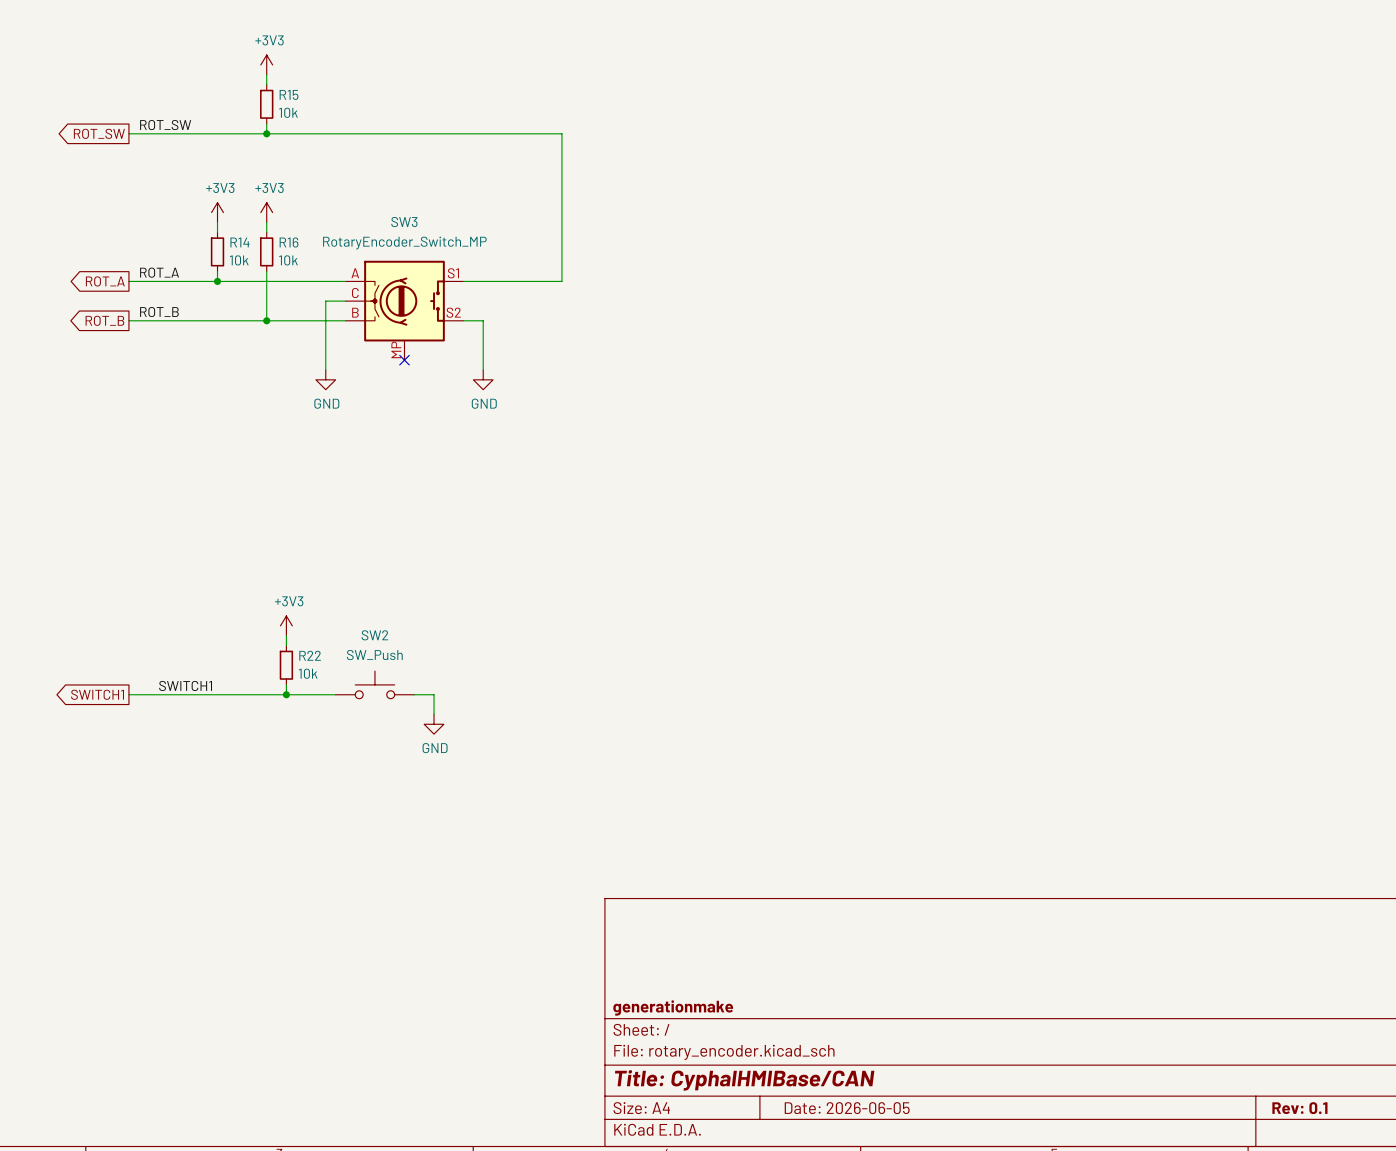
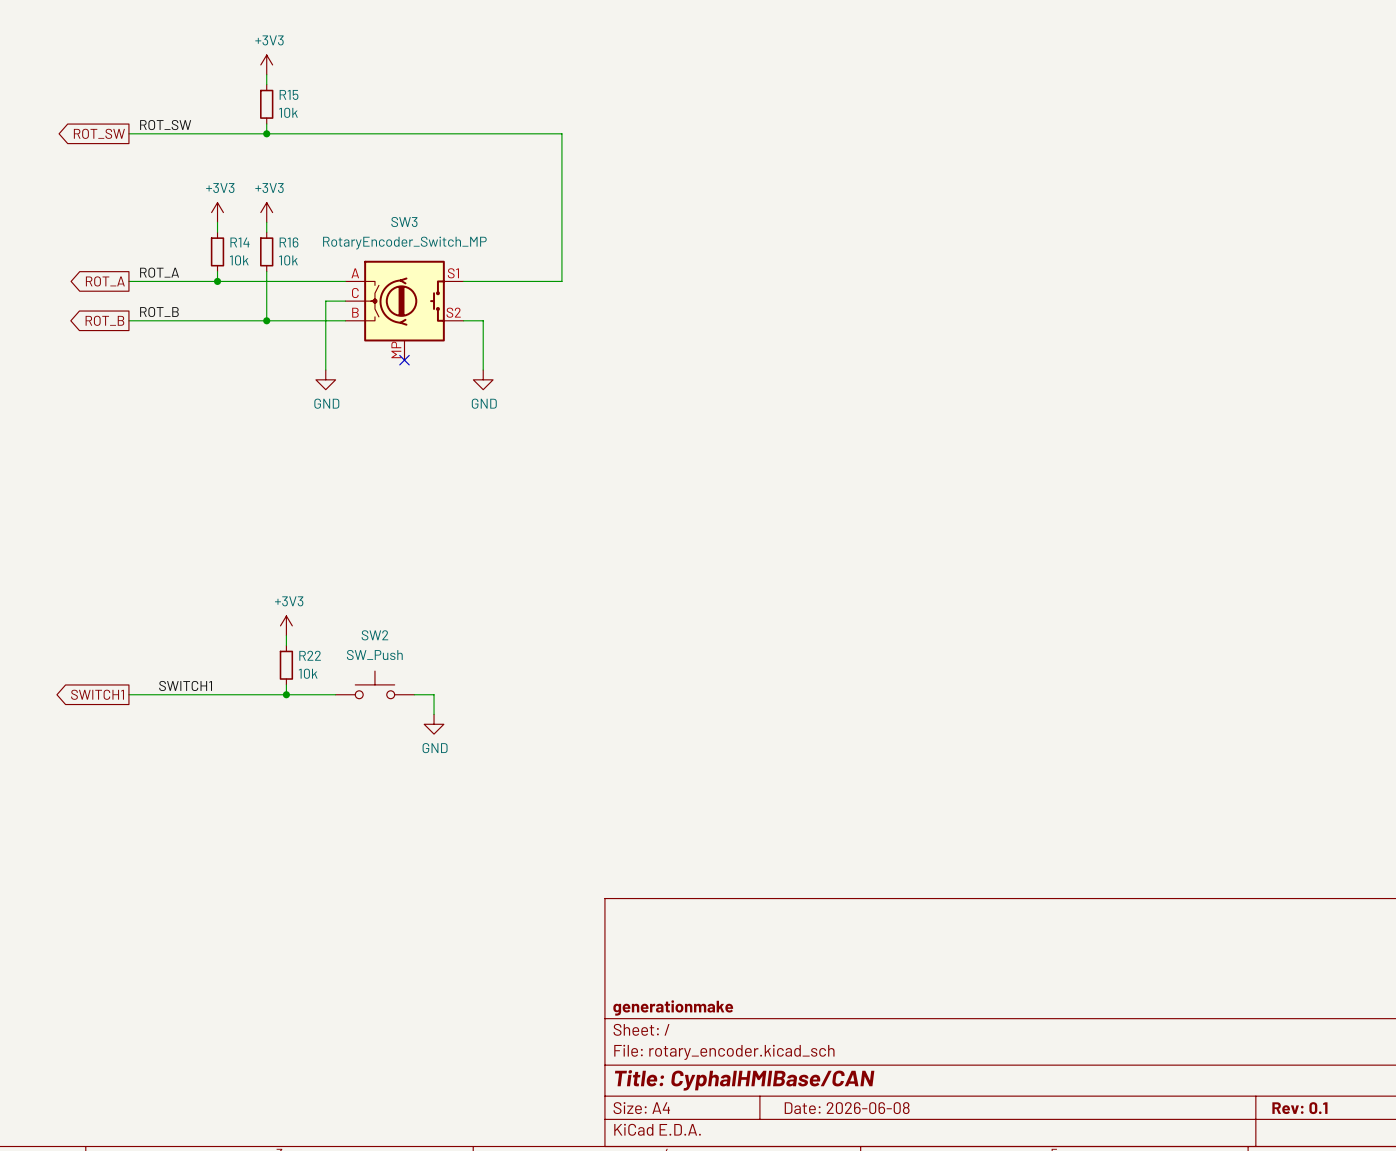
title block: Date: 2026-06-05 (847, 1108) -> Date: 2026-06-08 (847, 1108)

